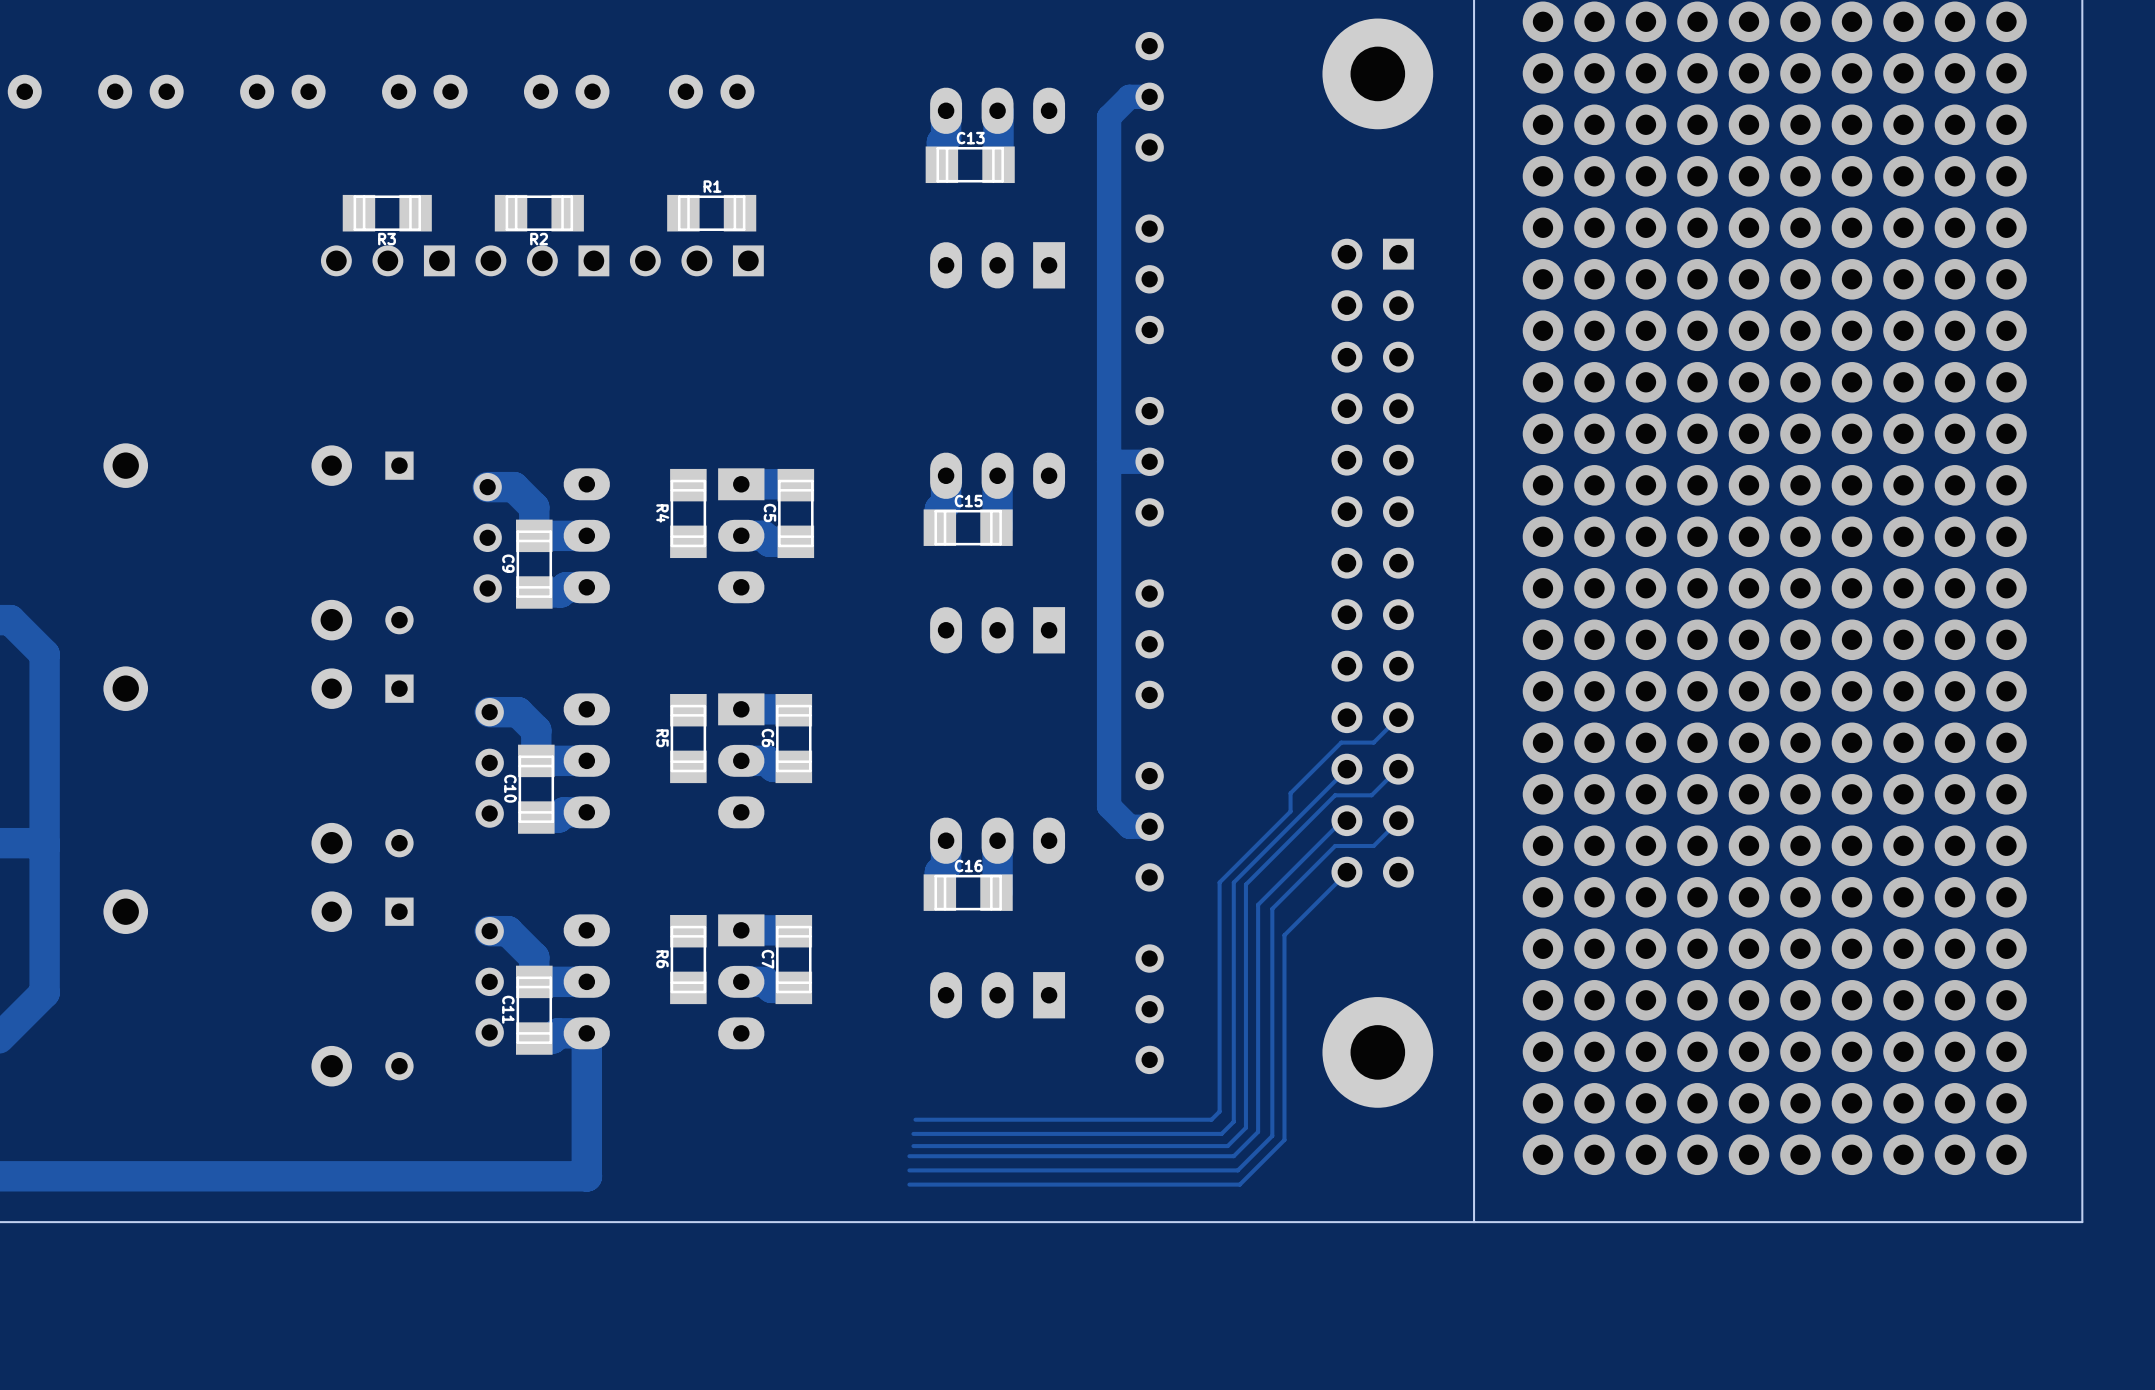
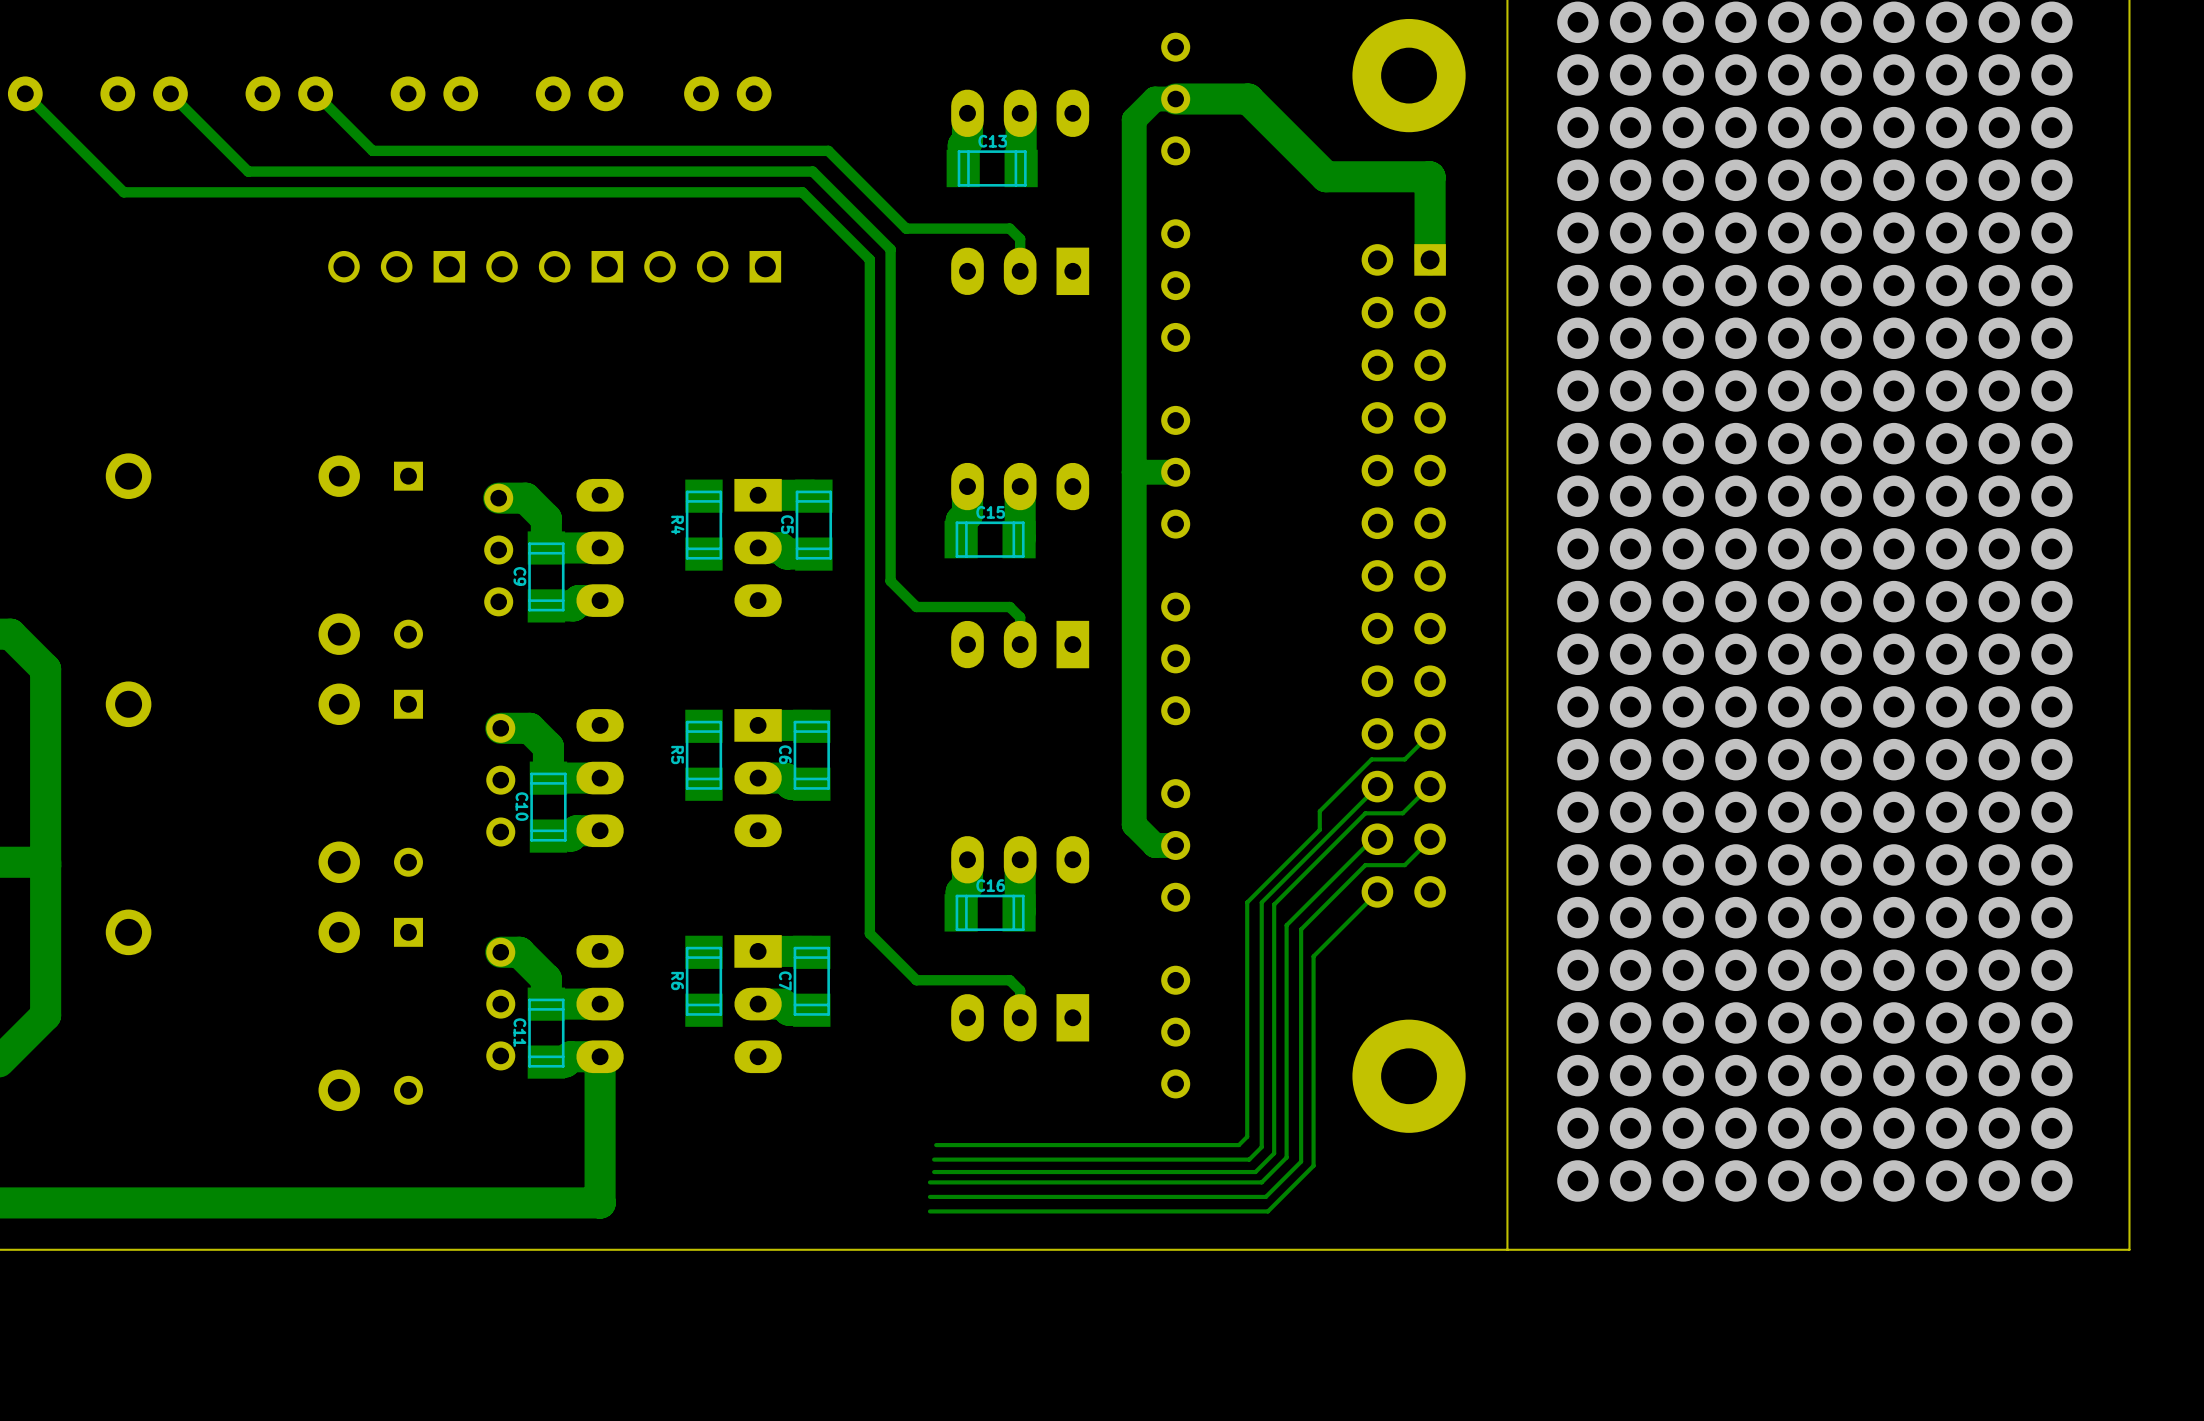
track: none -> (25, 93) (123, 192) (802, 192) (869, 259) (869, 933) (916, 980) (1009, 980) (1020, 990) (1020, 1017)
track: none -> (170, 93) (248, 171) (812, 171) (890, 249) (890, 581) (916, 607) (1009, 607) (1020, 617) (1020, 644)
track: none -> (315, 93) (372, 150) (828, 150) (906, 228) (1009, 228) (1020, 238) (1020, 271)
track: none -> (1175, 99) (1248, 99) (1326, 176) (1429, 176) (1430, 259)
R3: (387, 213) -> none
R2: (539, 213) -> none
R1: (711, 213) -> none

